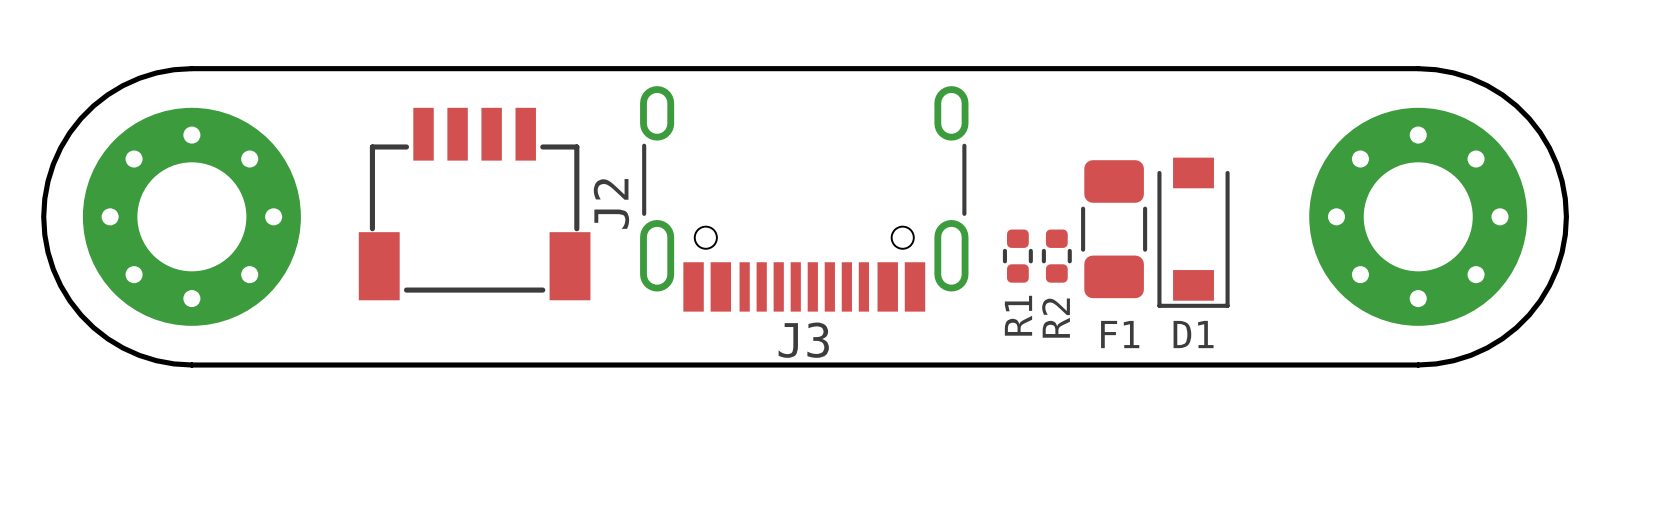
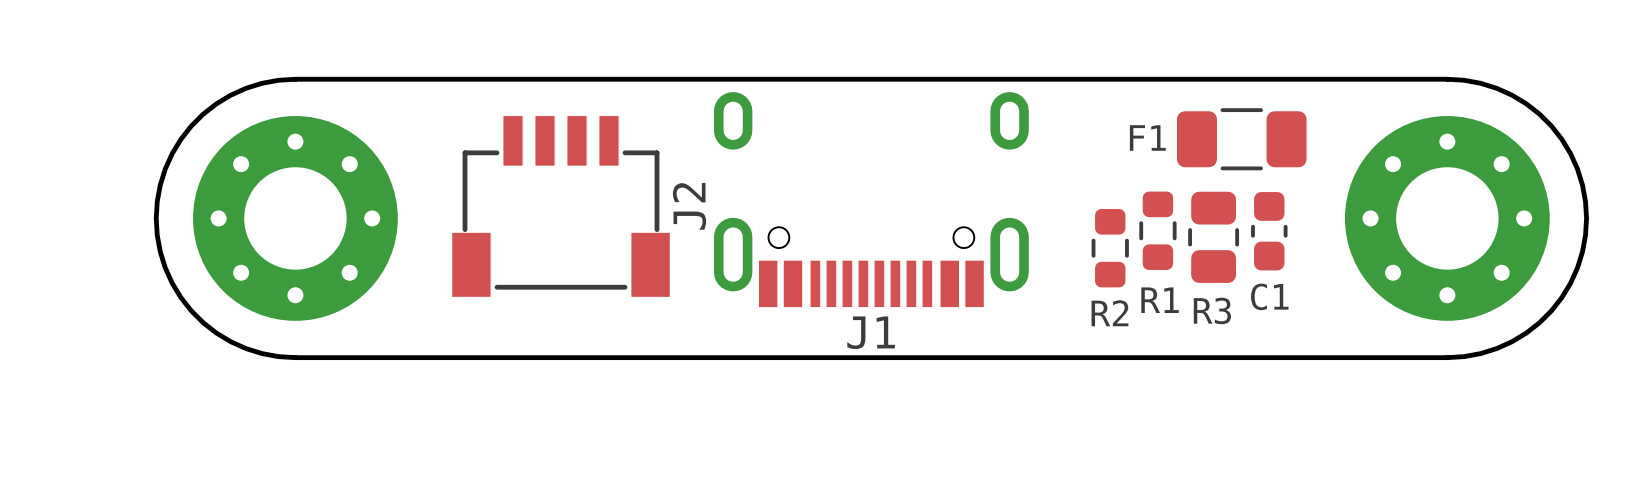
J1: none -> (871, 199)
J3: (804, 198) -> none
R1 footprint: [1002, 229, 1033, 283] -> [1139, 191, 1177, 270]
R2 footprint: [1041, 229, 1072, 283] -> [1091, 209, 1129, 288]
F1 rotation: 0° (1114, 229) -> 90° clockwise (1241, 139)
F1 position: (1114, 229) -> (1241, 139)
C1: none -> (1269, 231)
D1: (1193, 232) -> none
R3: none -> (1213, 237)
R2 name rotation: 0° (1056, 318) -> 90° clockwise (1109, 313)

